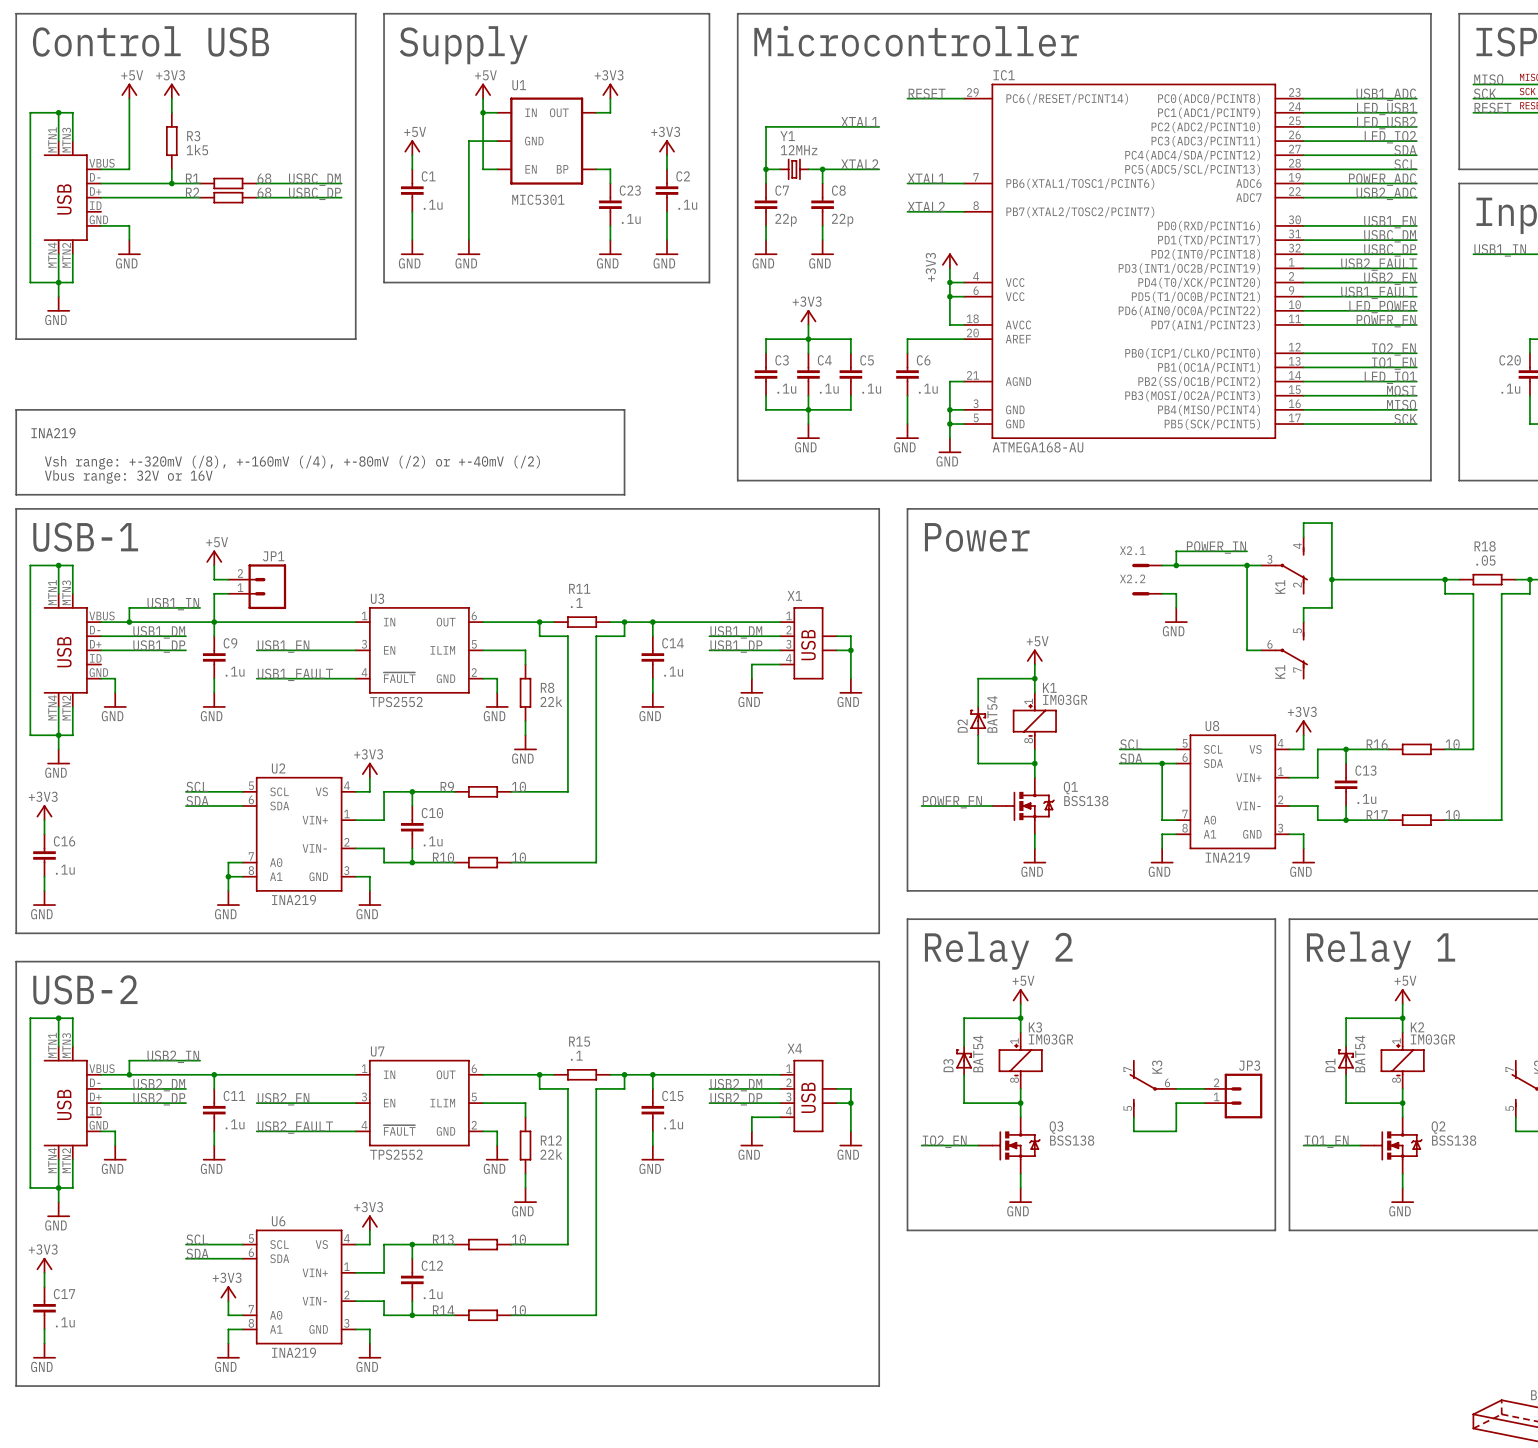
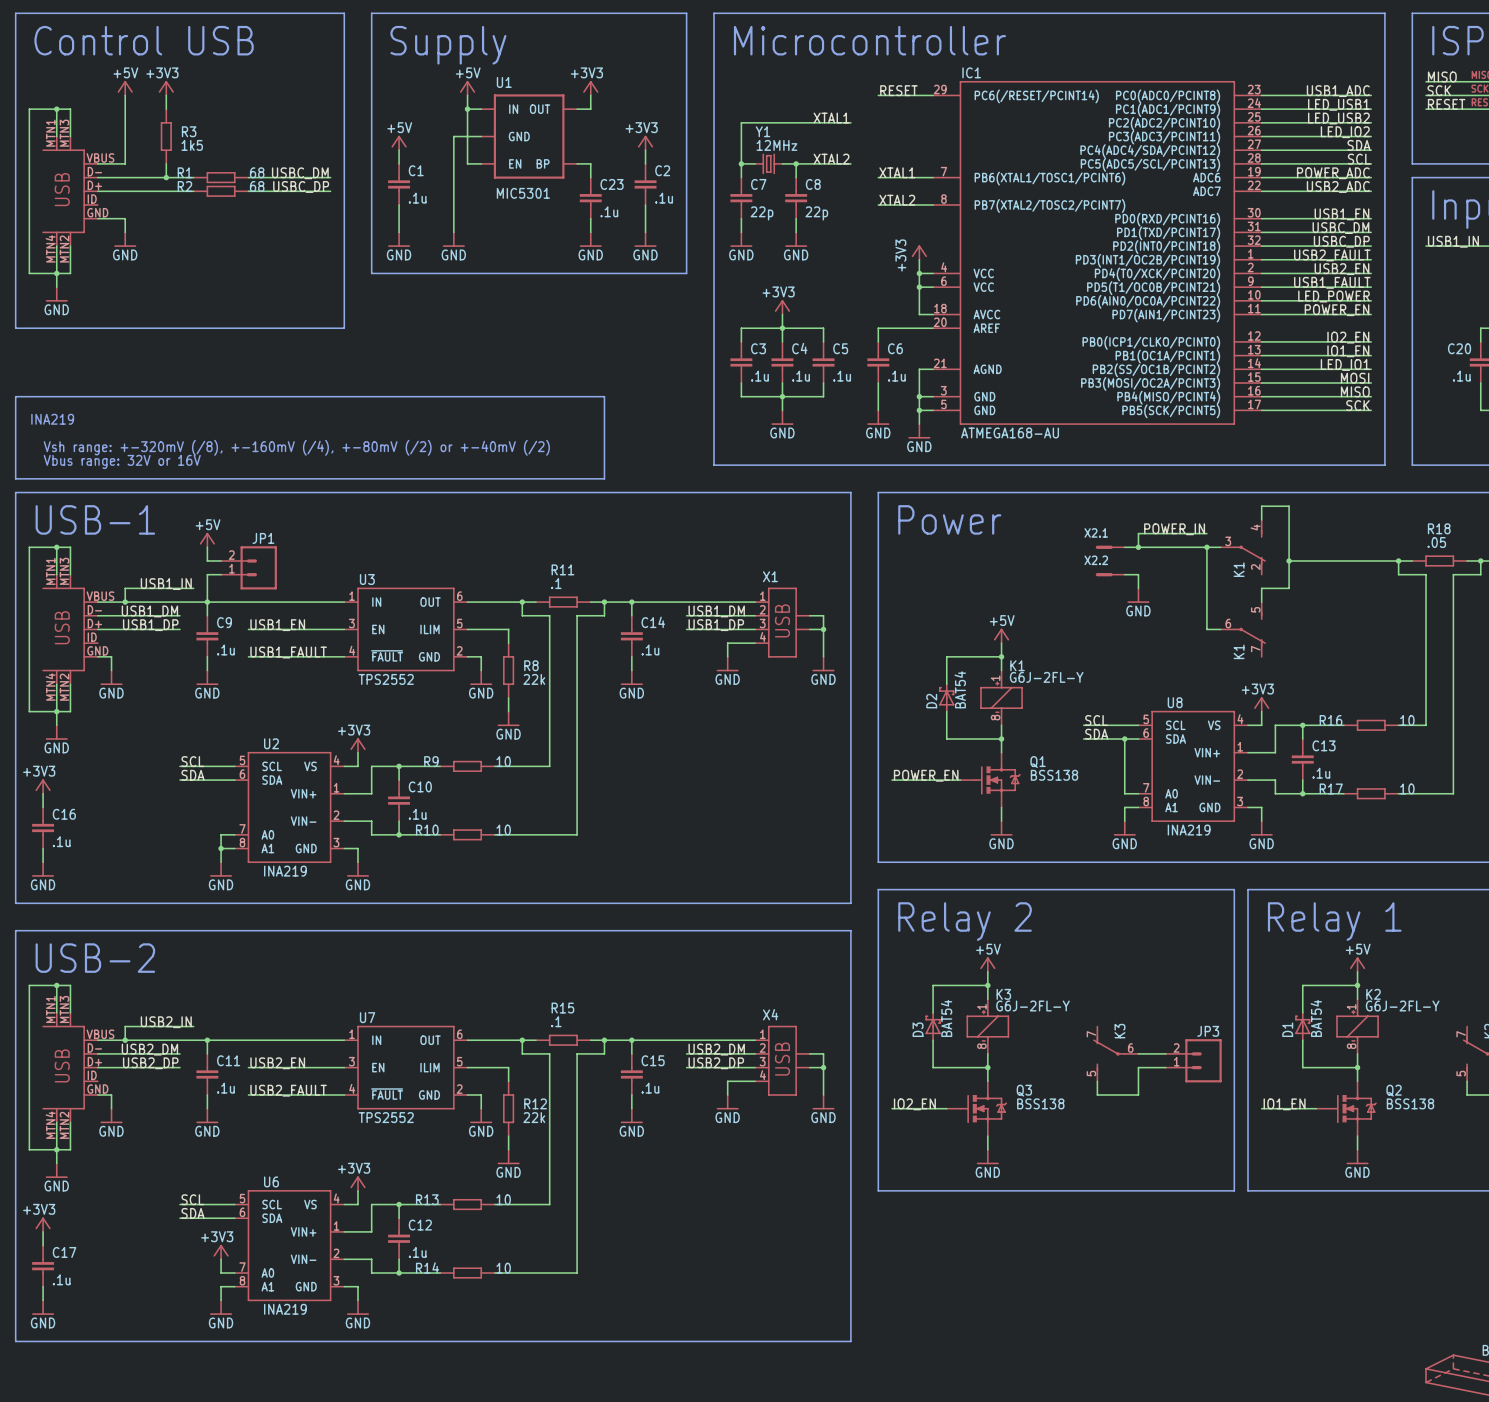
K1 value: IM03GR (1065, 699) -> G6J-2FL-Y (1046, 677)
K3 value: IM03GR (1050, 1039) -> G6J-2FL-Y (1032, 1006)
K2 value: IM03GR (1432, 1039) -> G6J-2FL-Y (1402, 1006)

